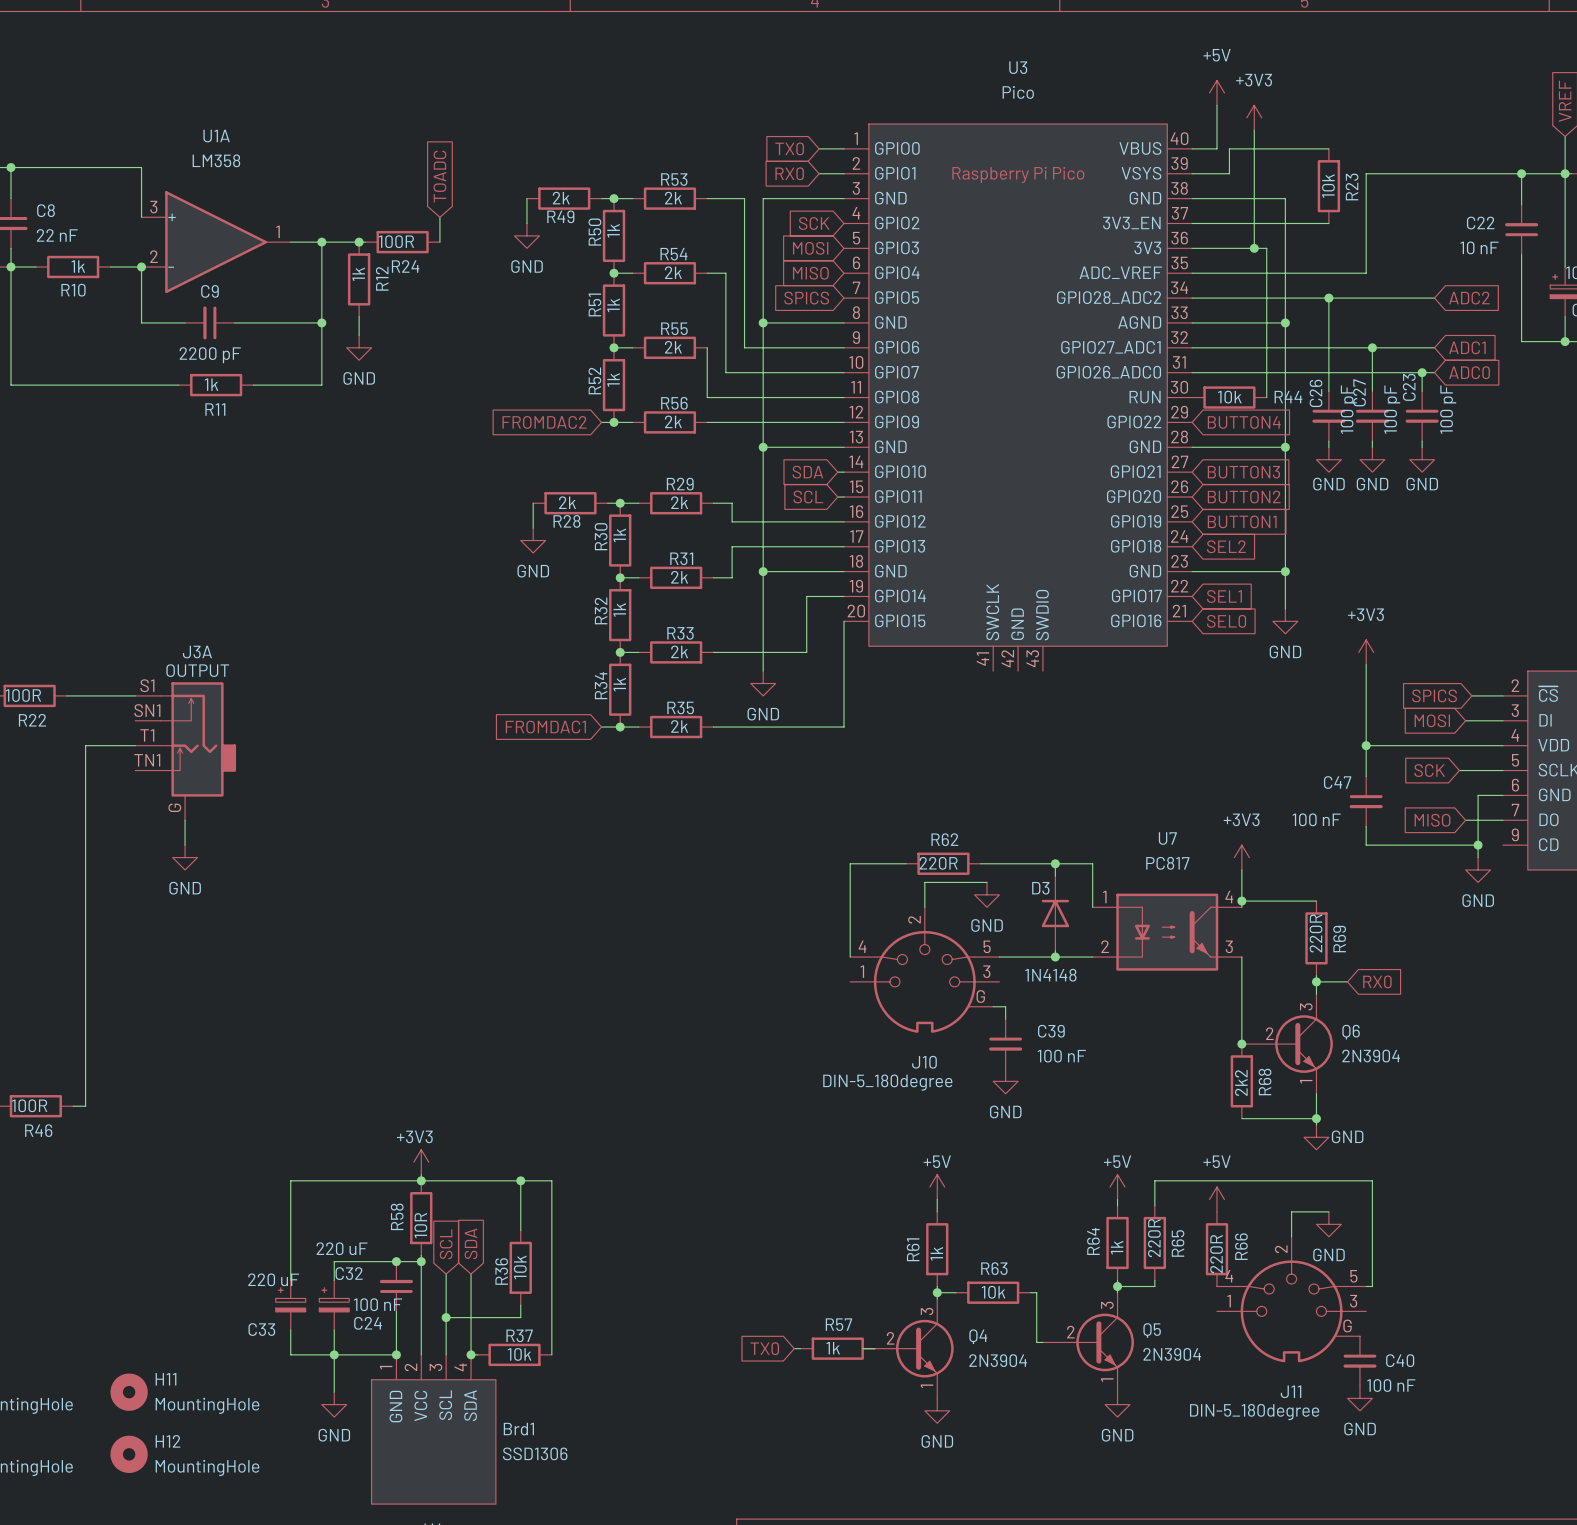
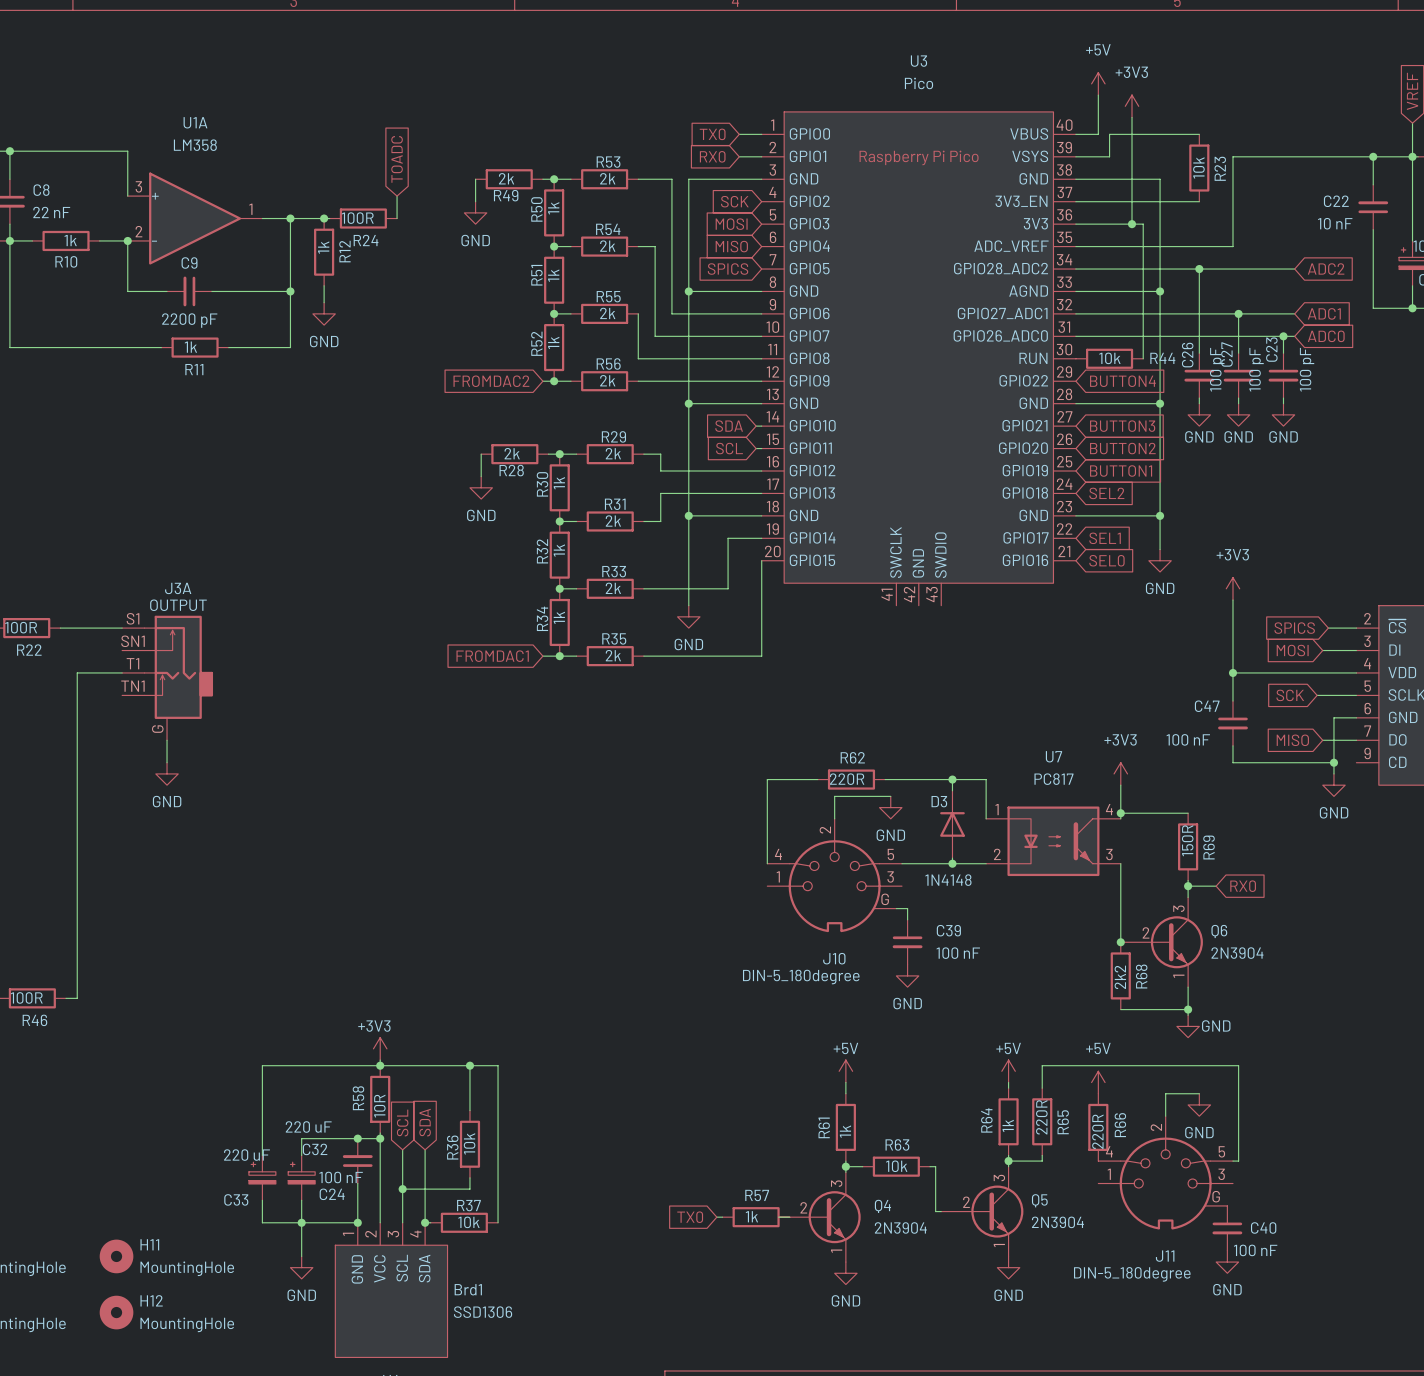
R69 value: 220R (1316, 933) -> 150R (1187, 840)

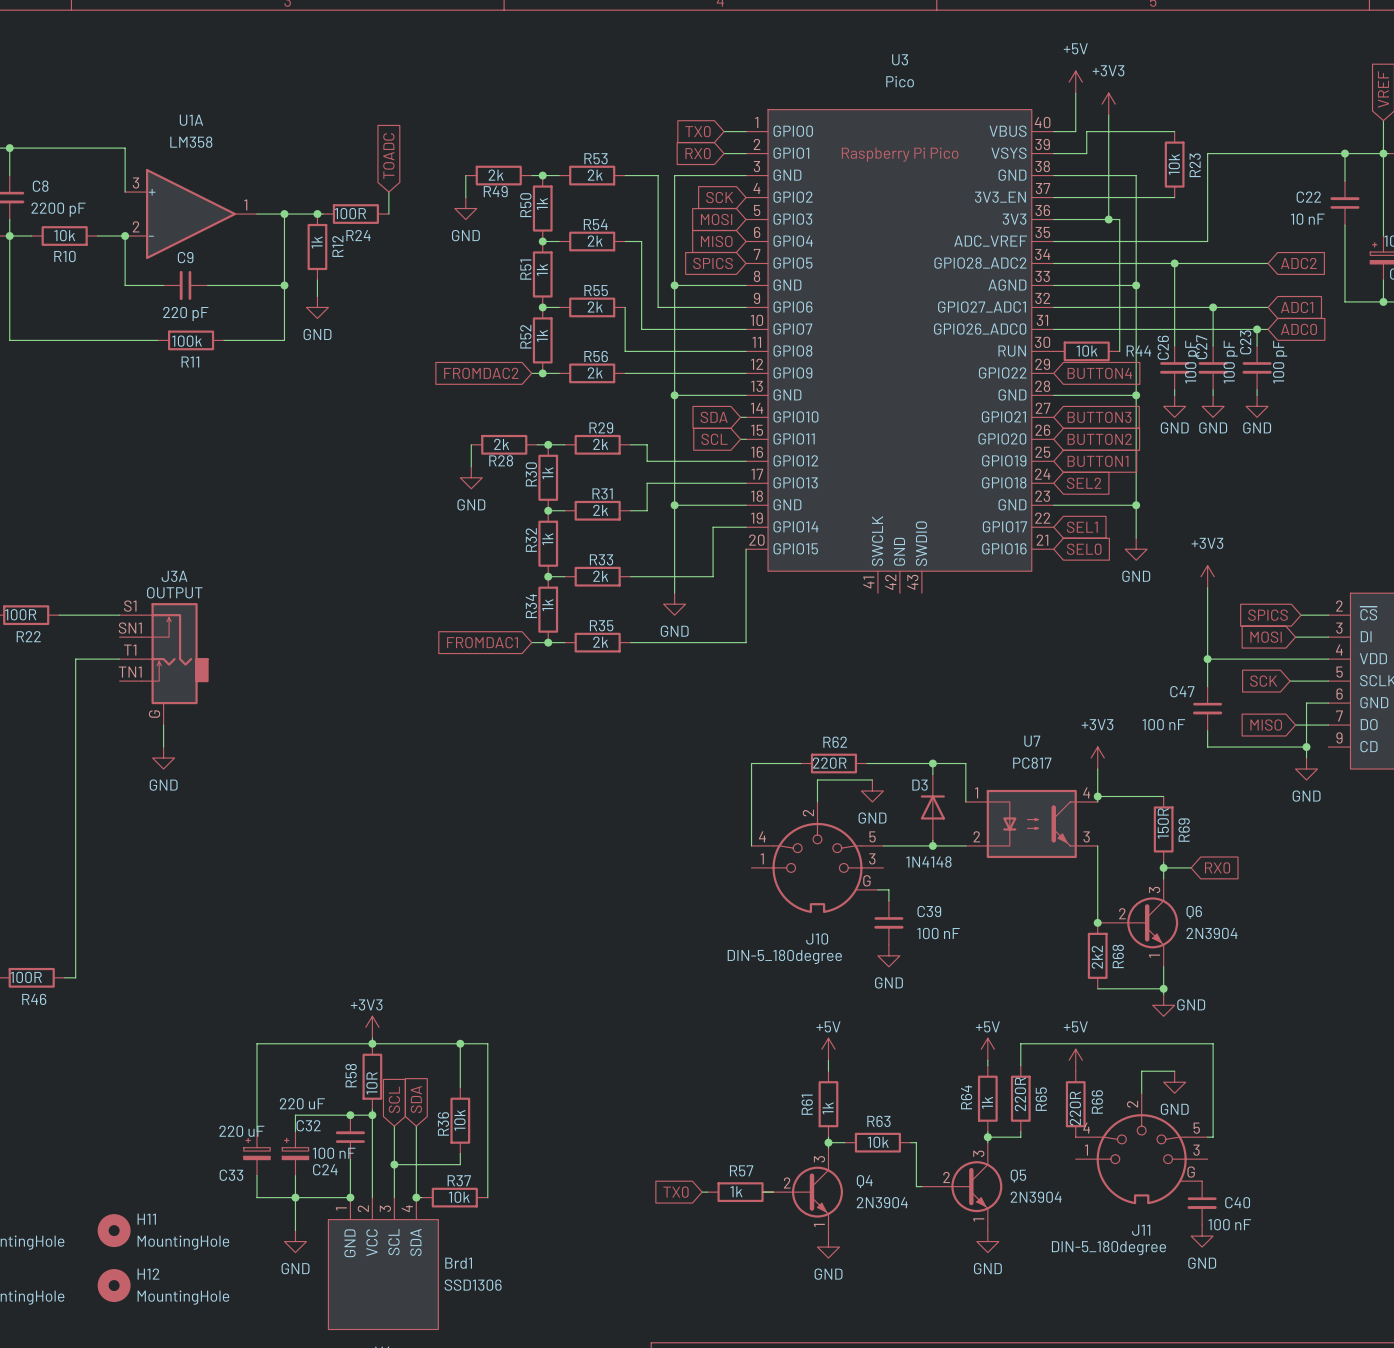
C8 value: 22 nF (51, 212) -> 2200 pF (58, 209)
R10 value: 1k (70, 240) -> 10k (64, 235)
C9 value: 2200 pF (189, 320) -> 220 pF (185, 313)
R11 value: 1k (190, 347) -> 100k (187, 341)

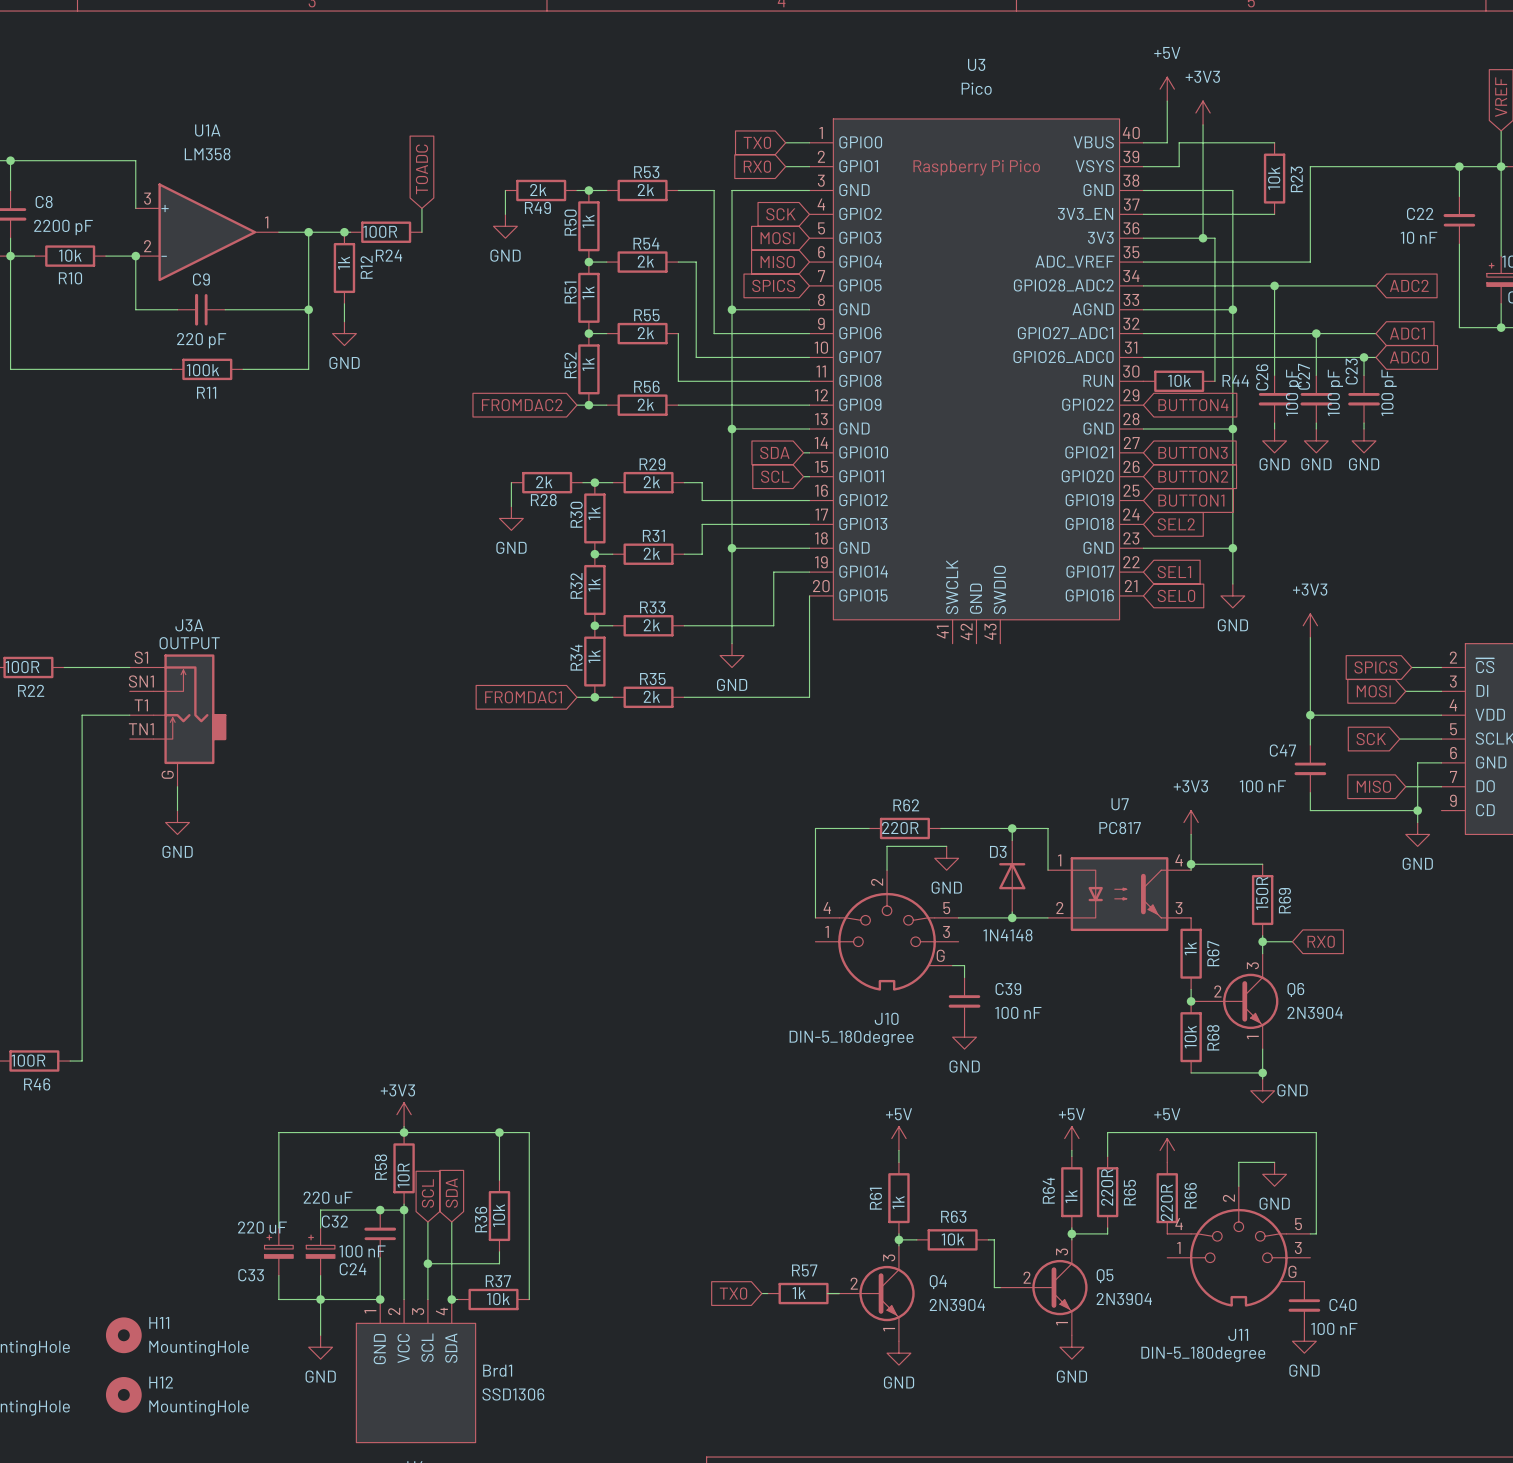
wire: (1097, 845) (1097, 911) -> none
R67: none -> 1k (1191, 953)
R68 value: 2k2 (1097, 957) -> 10k (1190, 1037)

